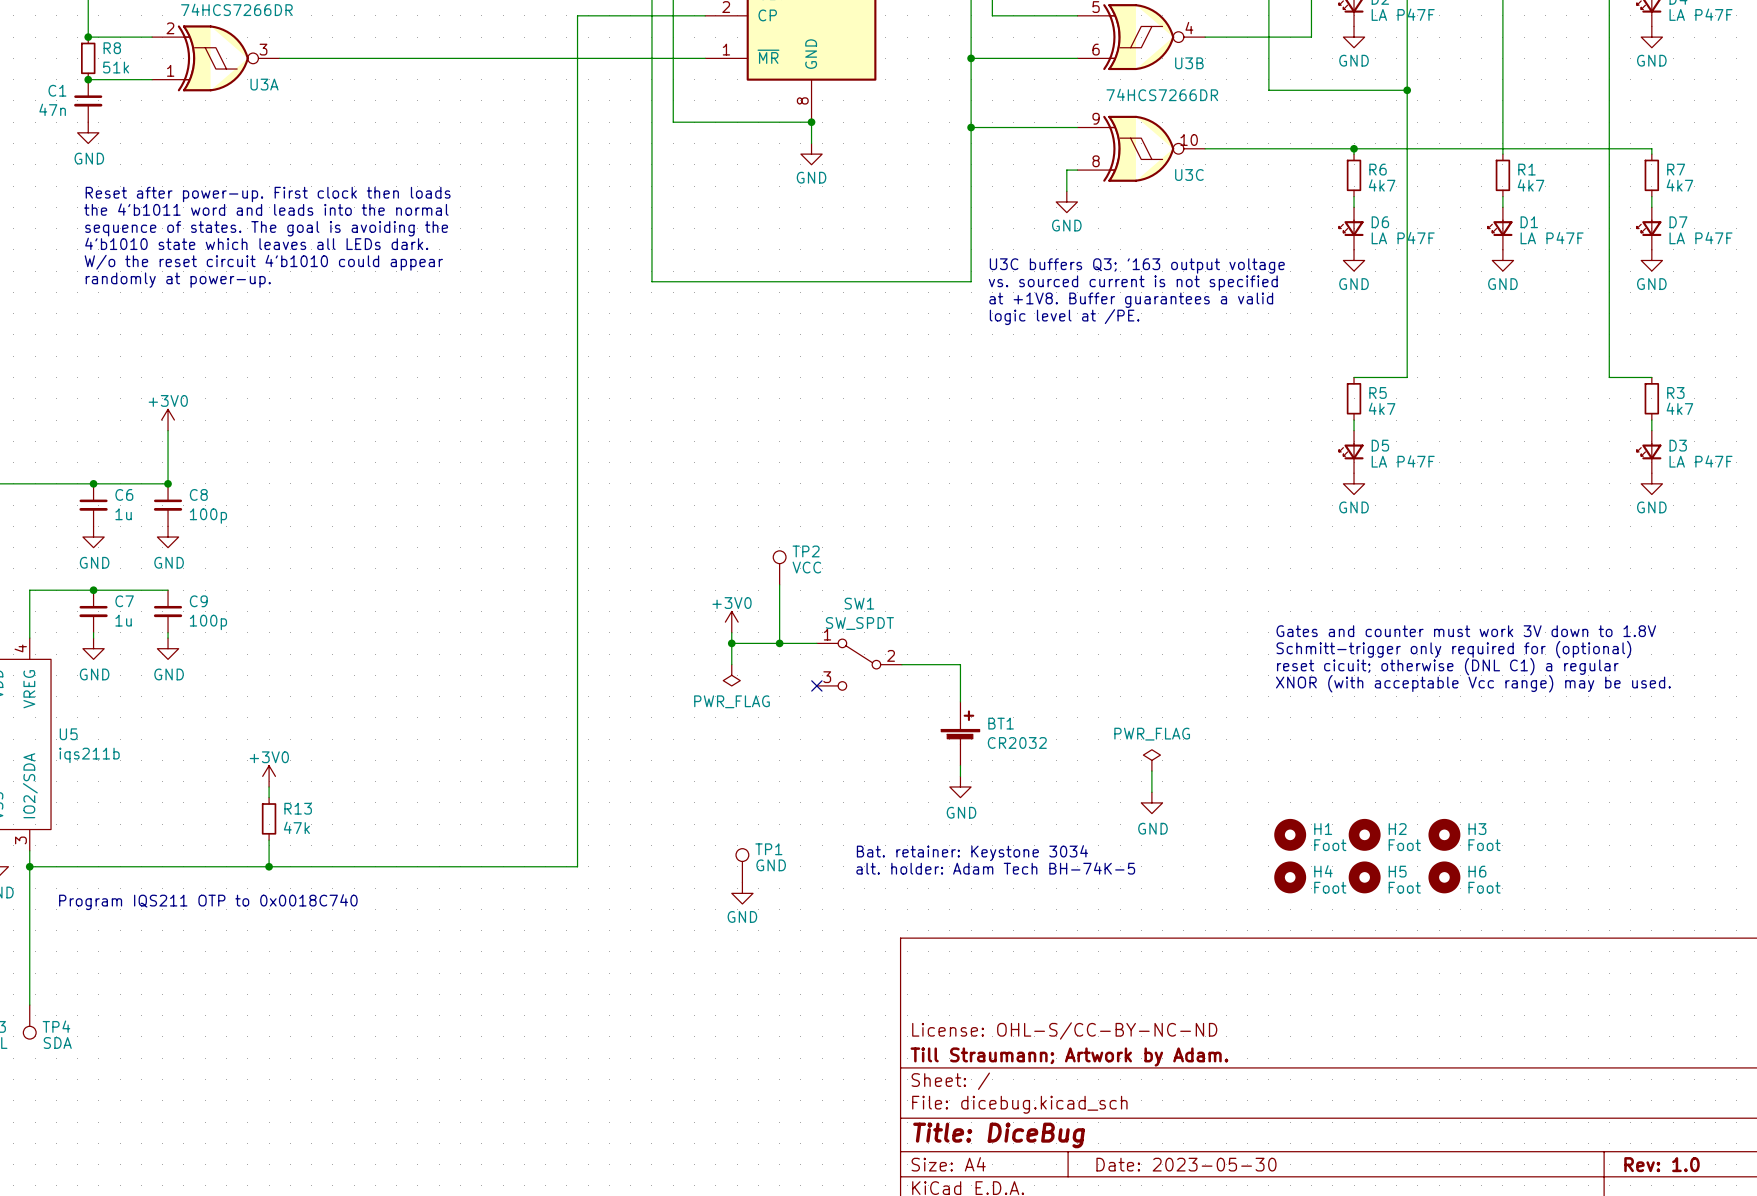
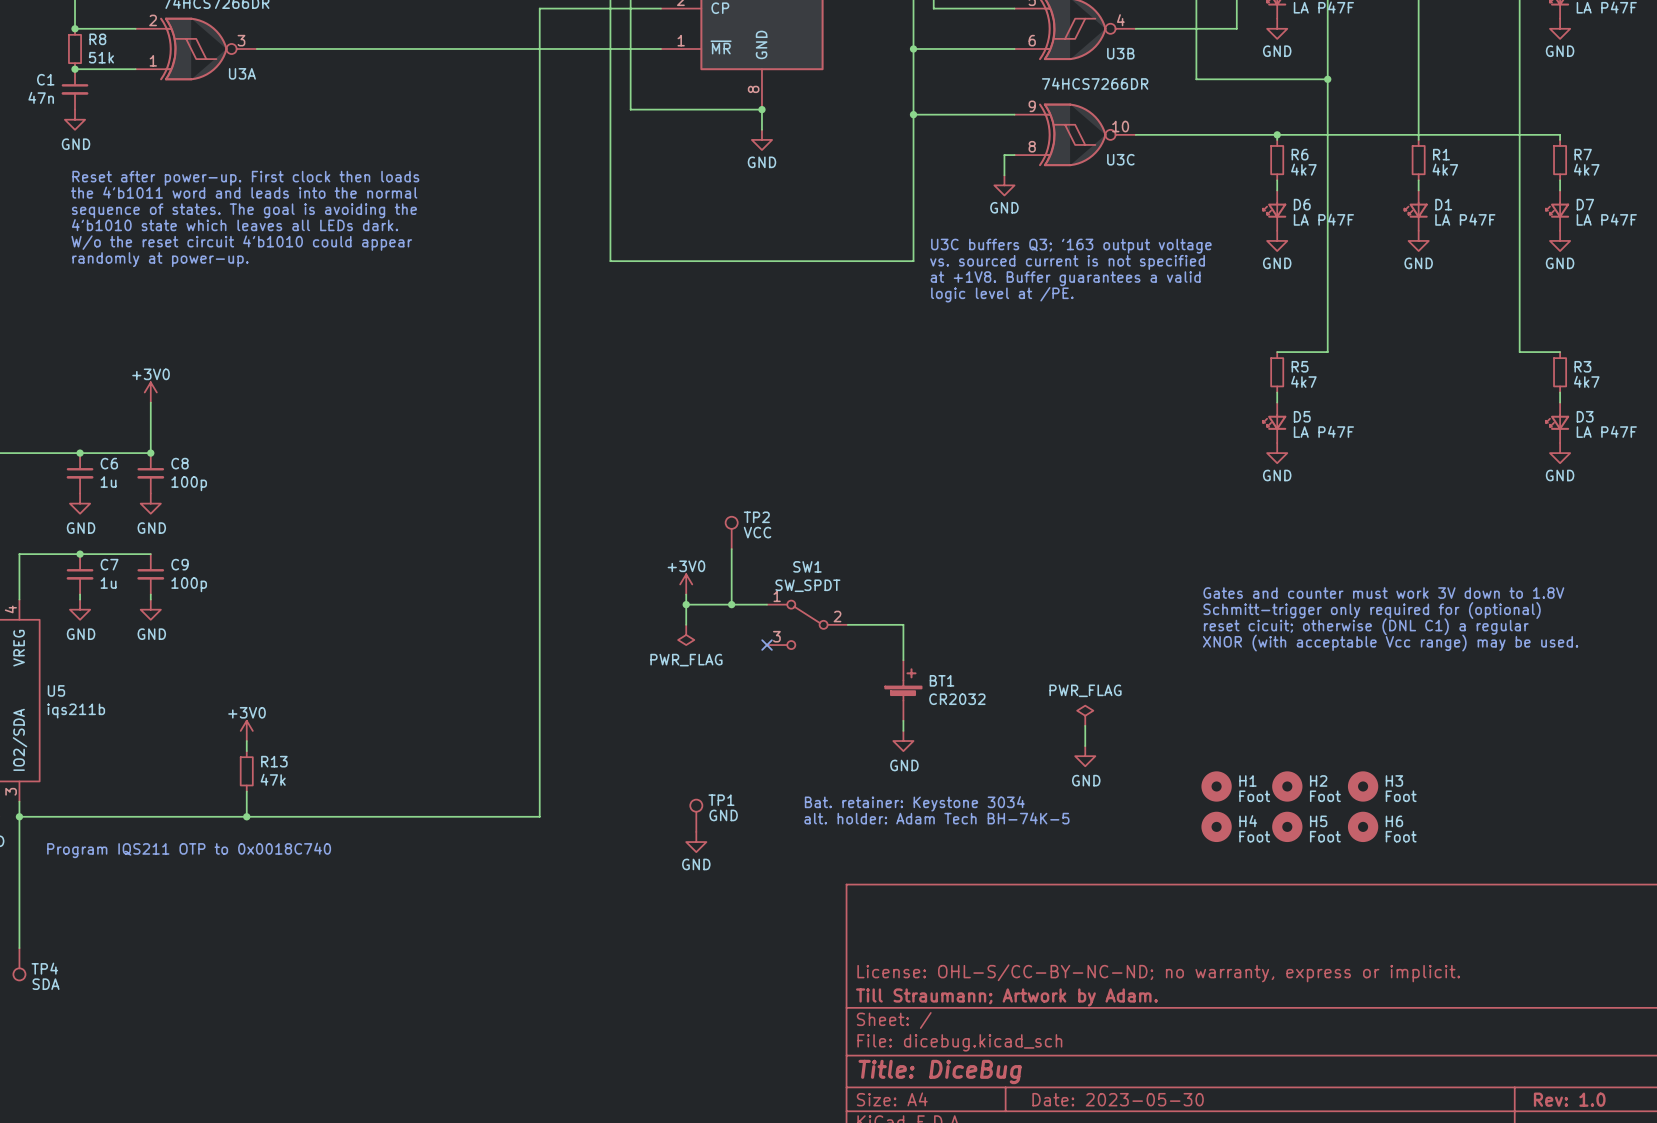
title block: License: OHL-S/CC-BY-NC-ND (1064, 1030) -> License: OHL-S/CC-BY-NC-ND; no warranty, express or implicit. (1158, 973)

